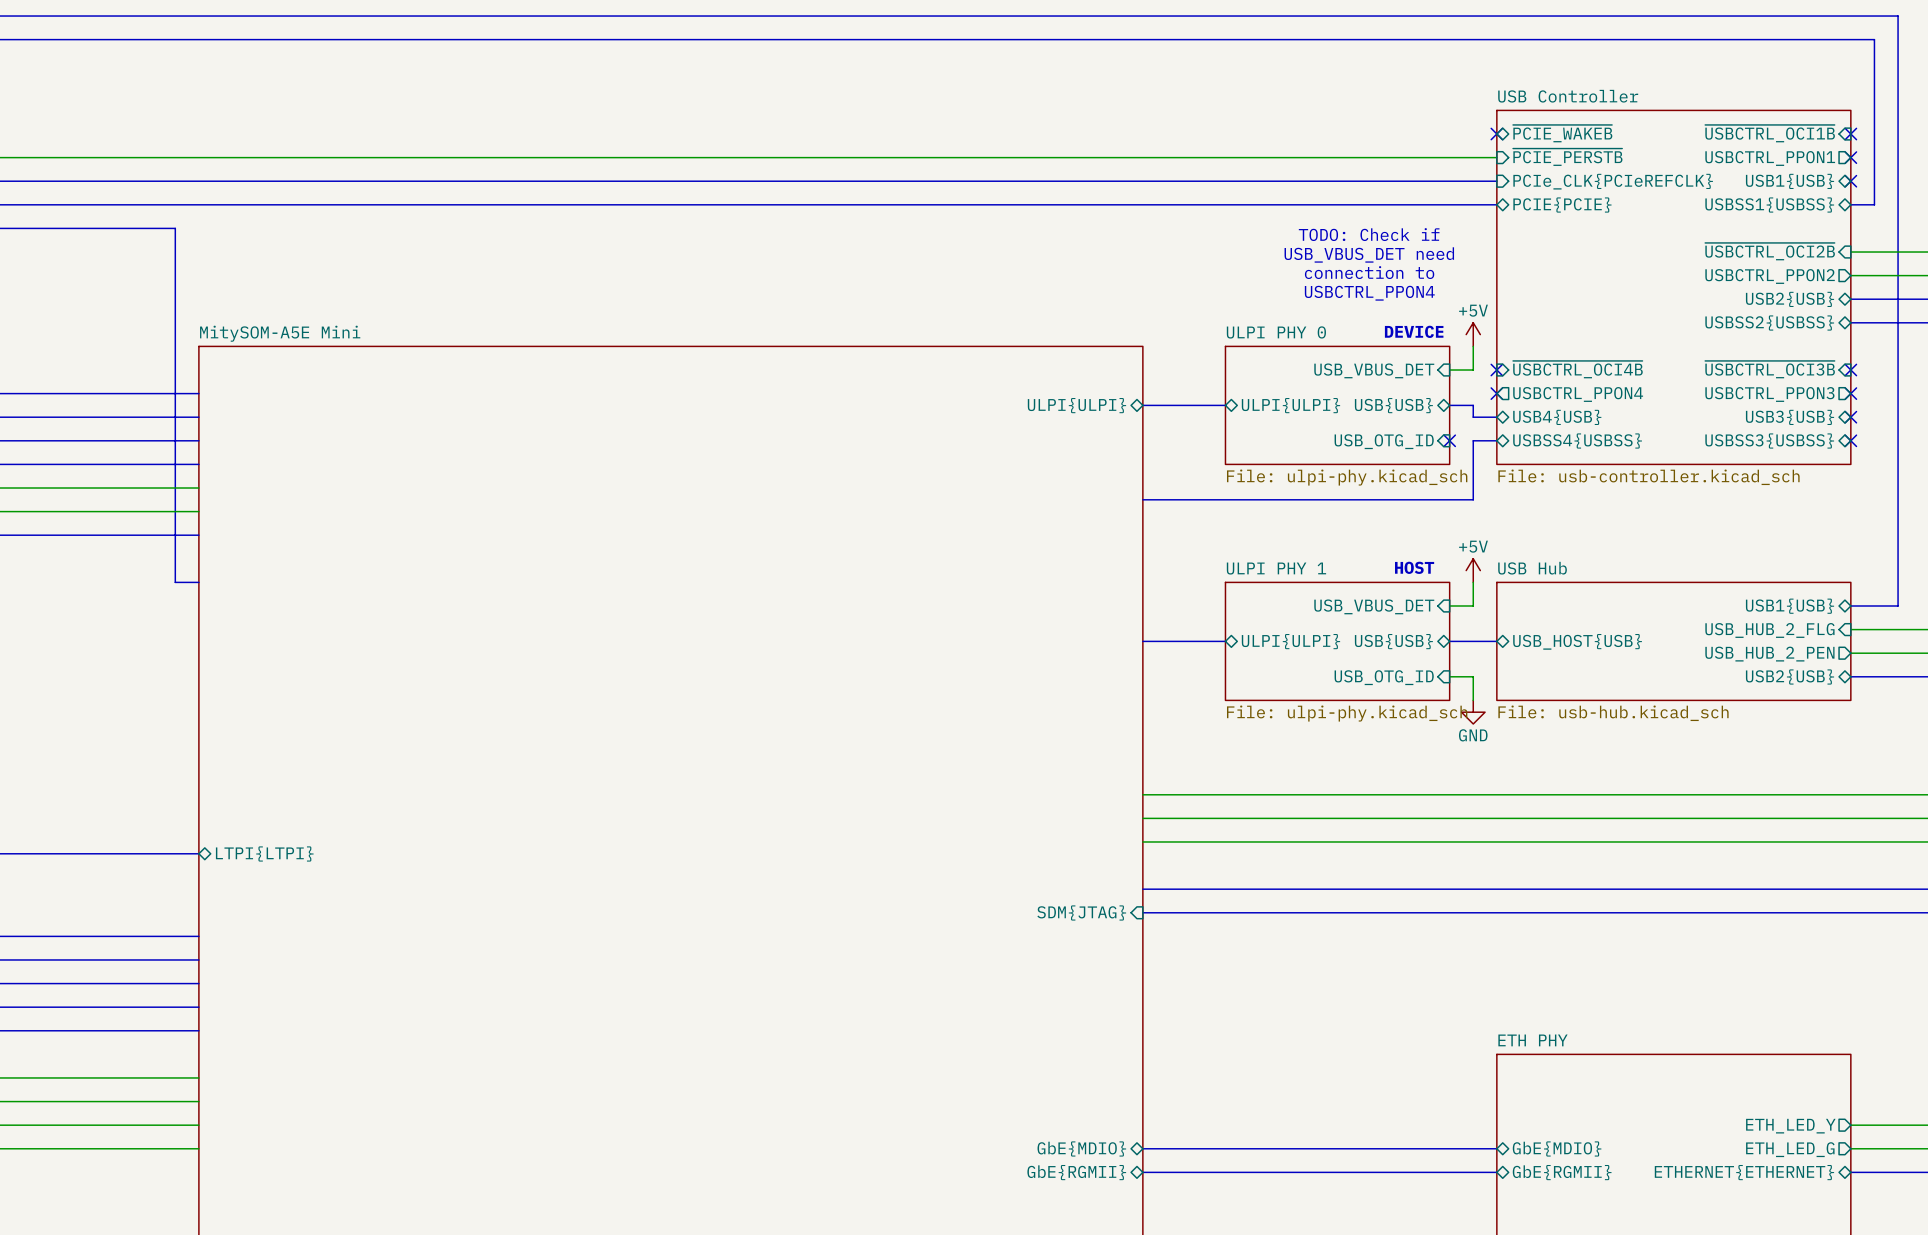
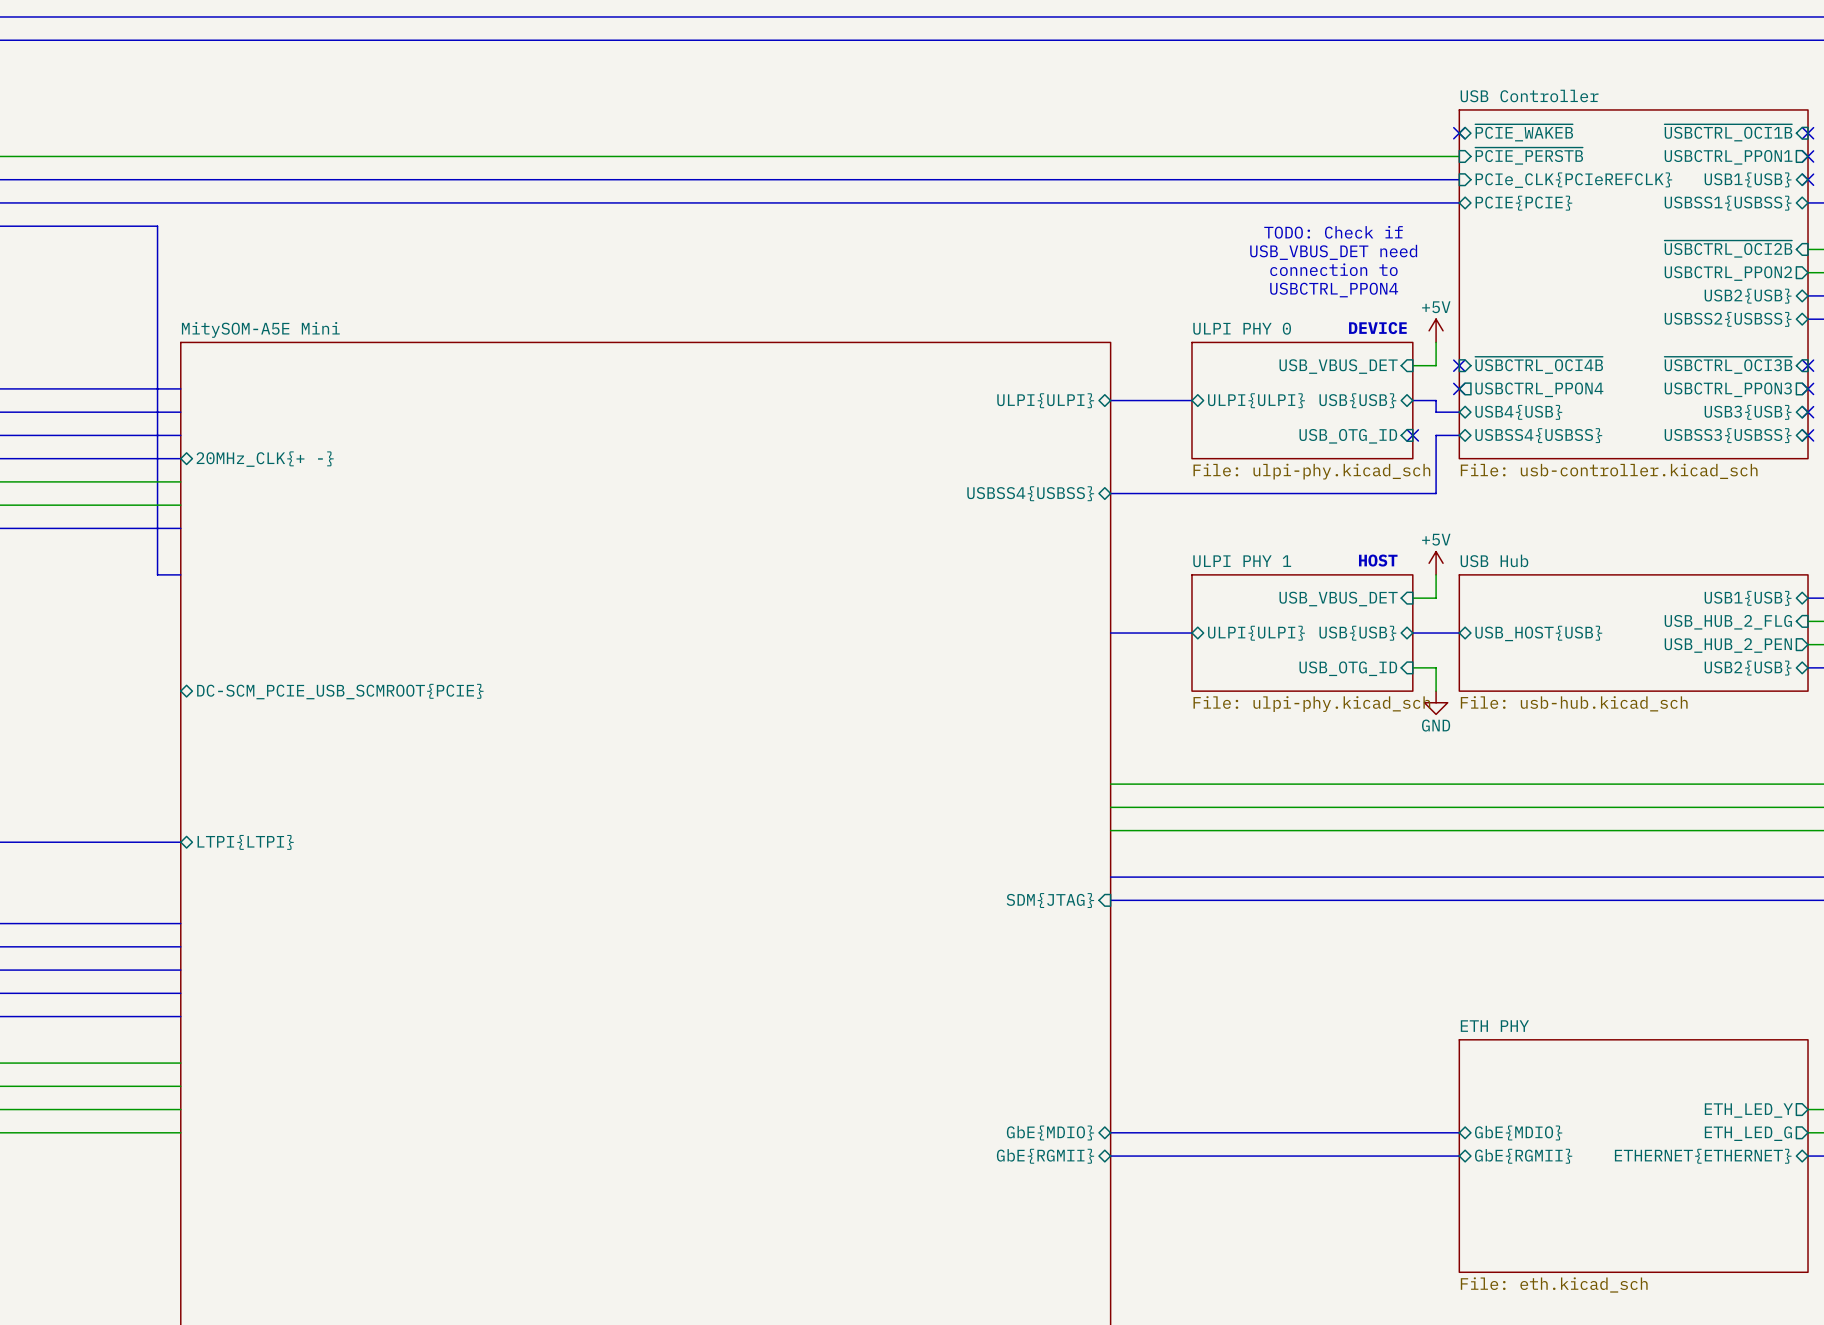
sheet pin: none -> 20MHz_CLK{+ -} (265, 459)
sheet pin: none -> USBSS4{USBSS} (1030, 493)
sheet pin: none -> DC-SCM_PCIE_USB_SCMROOT{PCIE} (340, 691)

